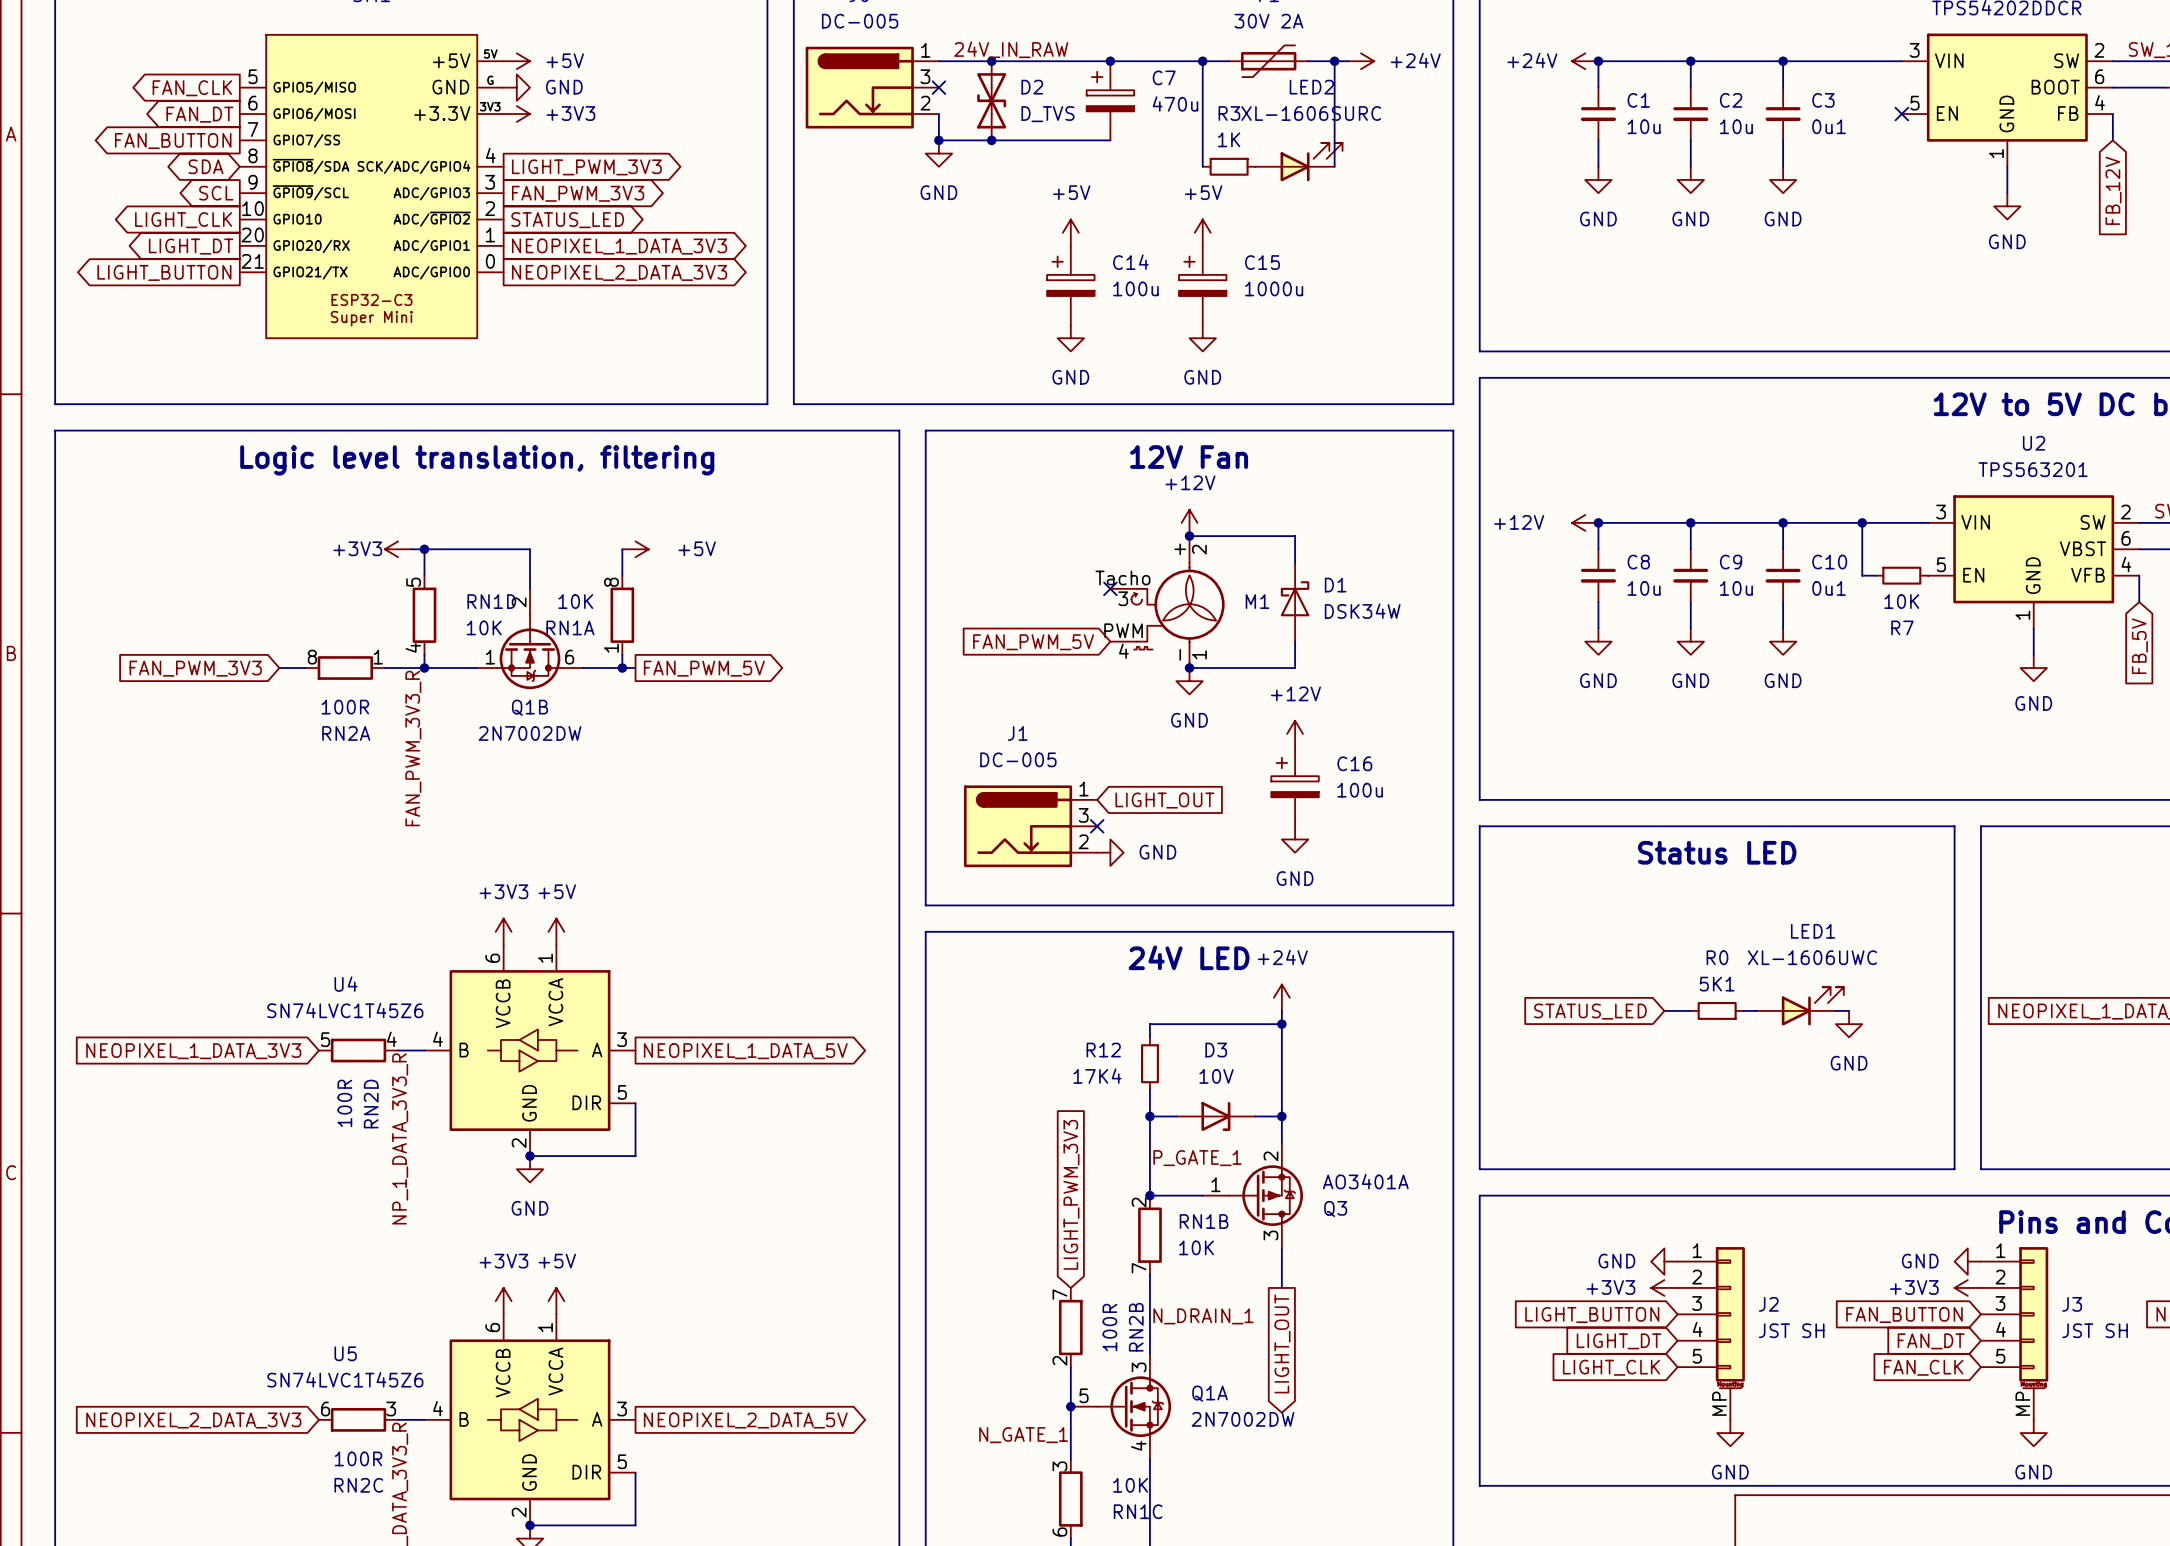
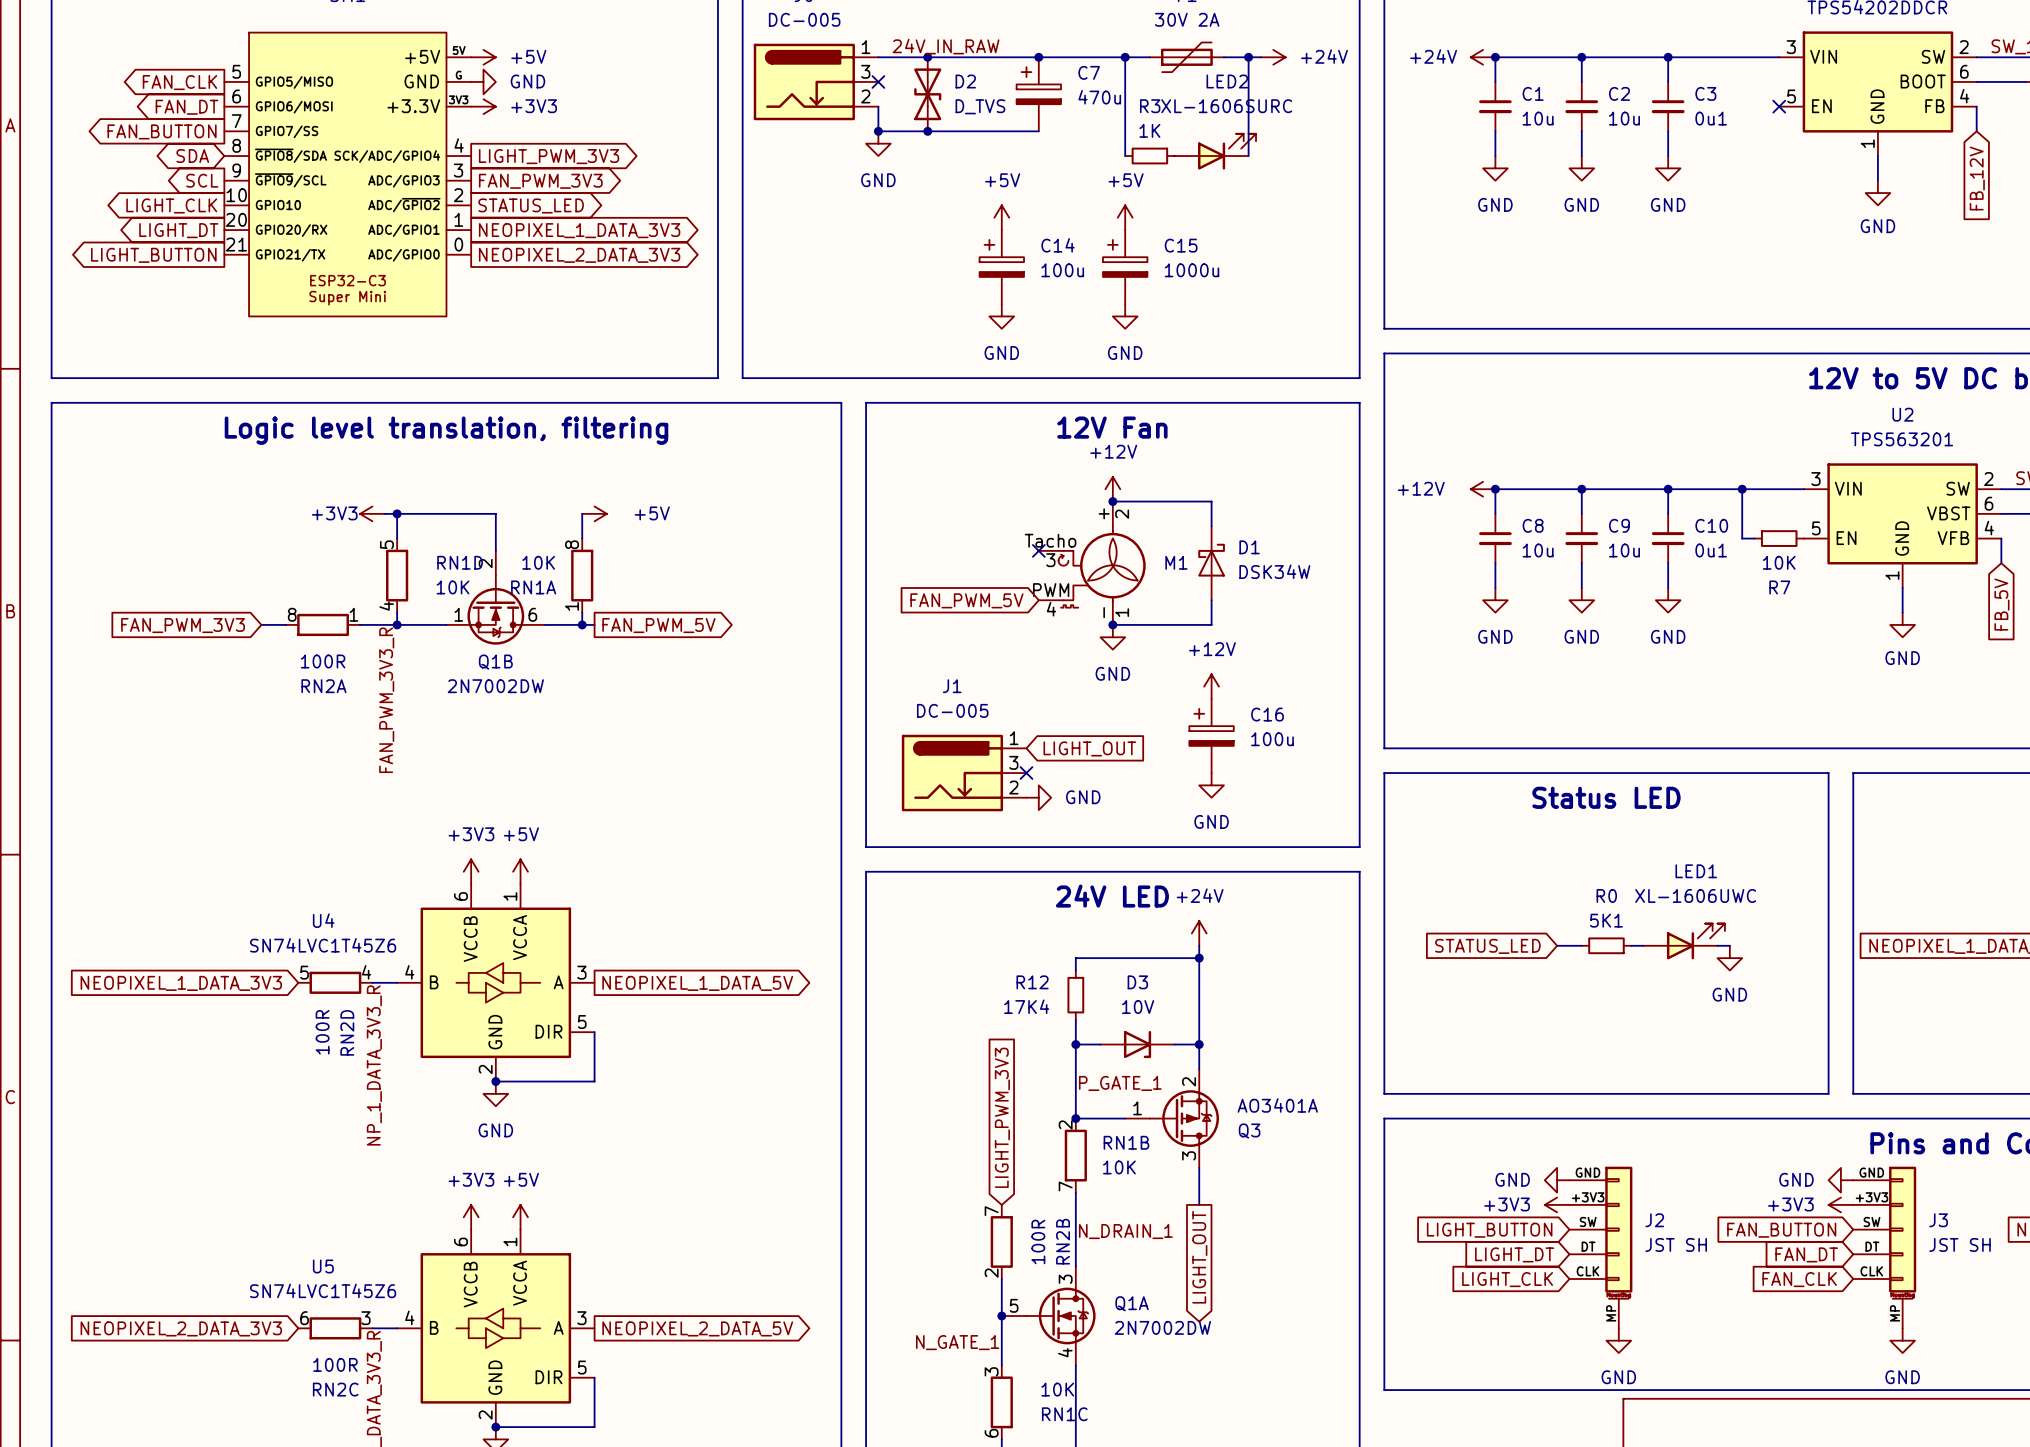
J2 symbol: [1677, 1247, 1745, 1420] -> [1569, 1166, 1633, 1329]
J3 symbol: [1980, 1247, 2049, 1420] -> [1853, 1166, 1917, 1329]

